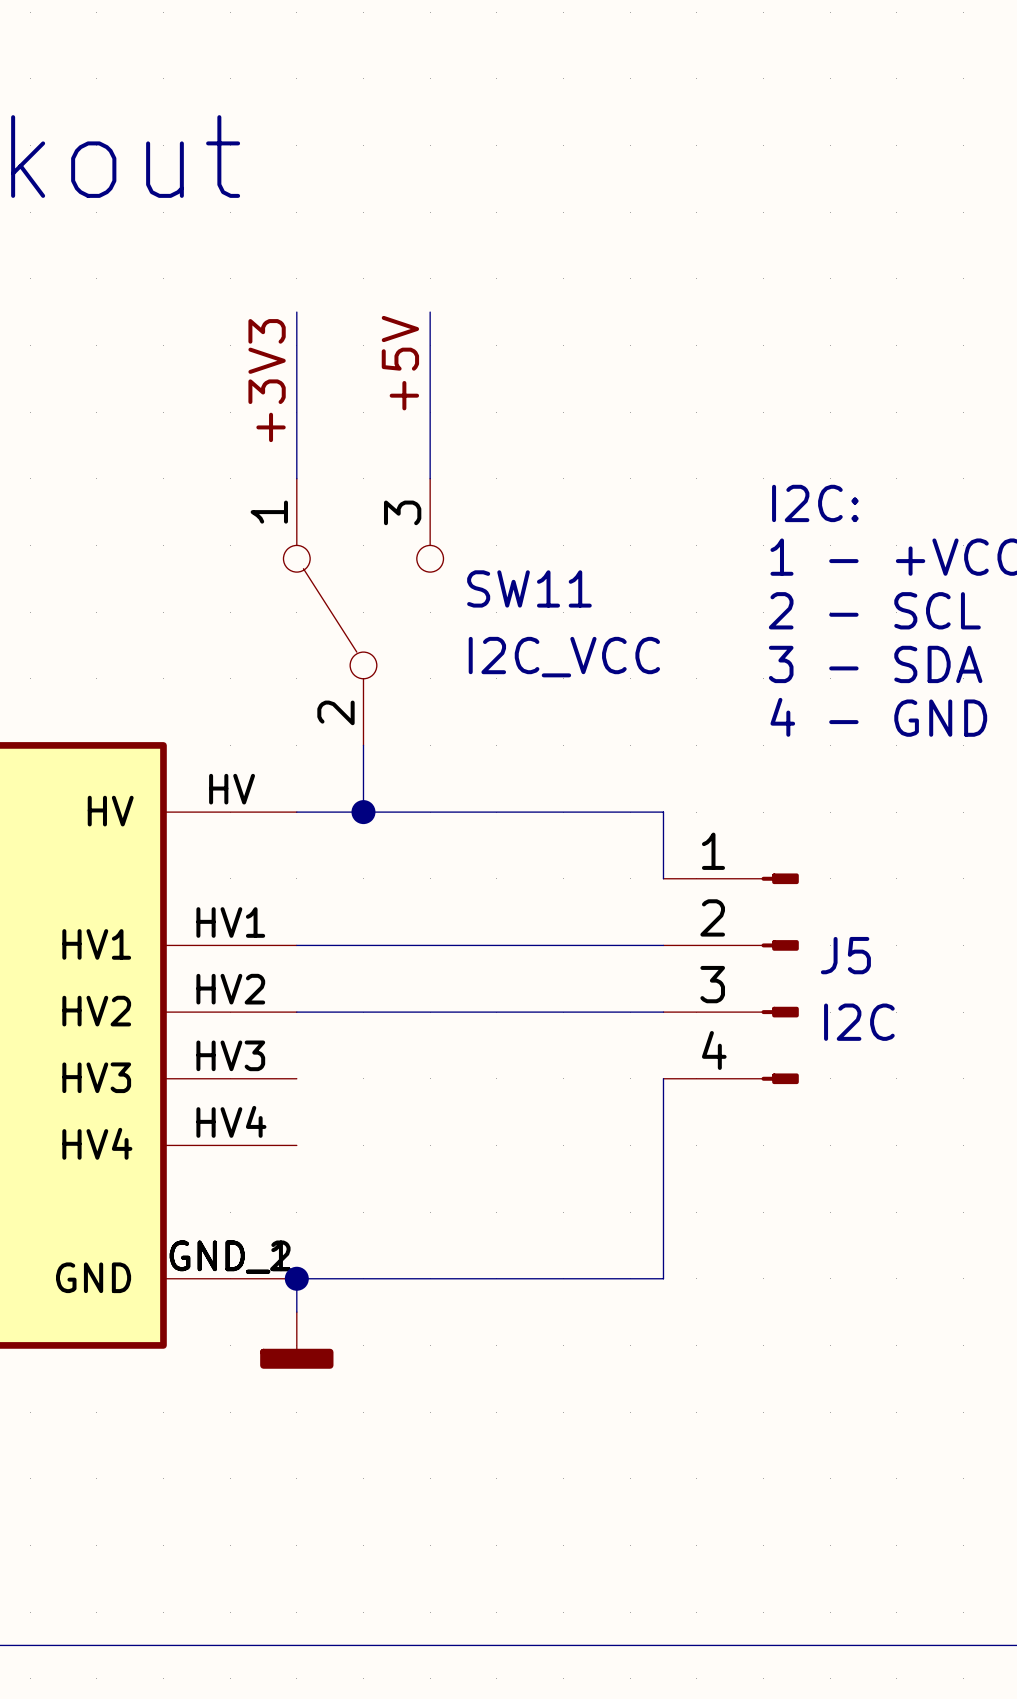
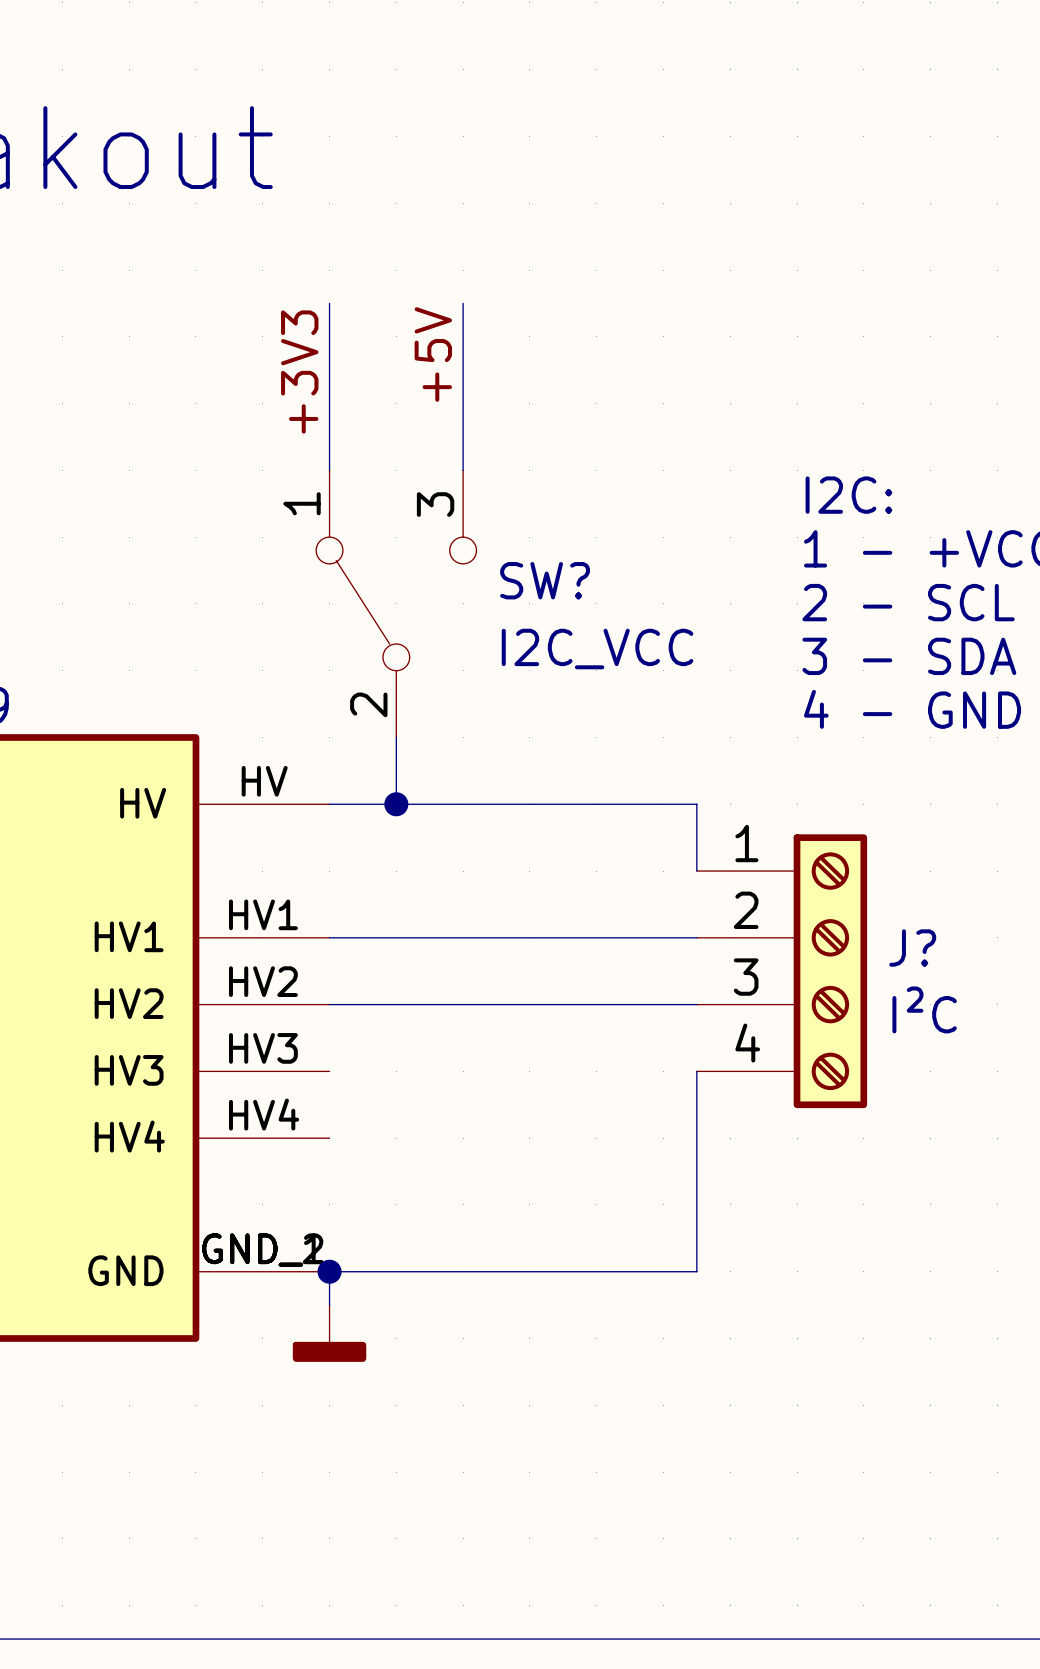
SW11 name: SW11 (529, 588) -> SW? (545, 580)
J5: I2C (731, 978) -> none
J?: none -> I²C (781, 971)

